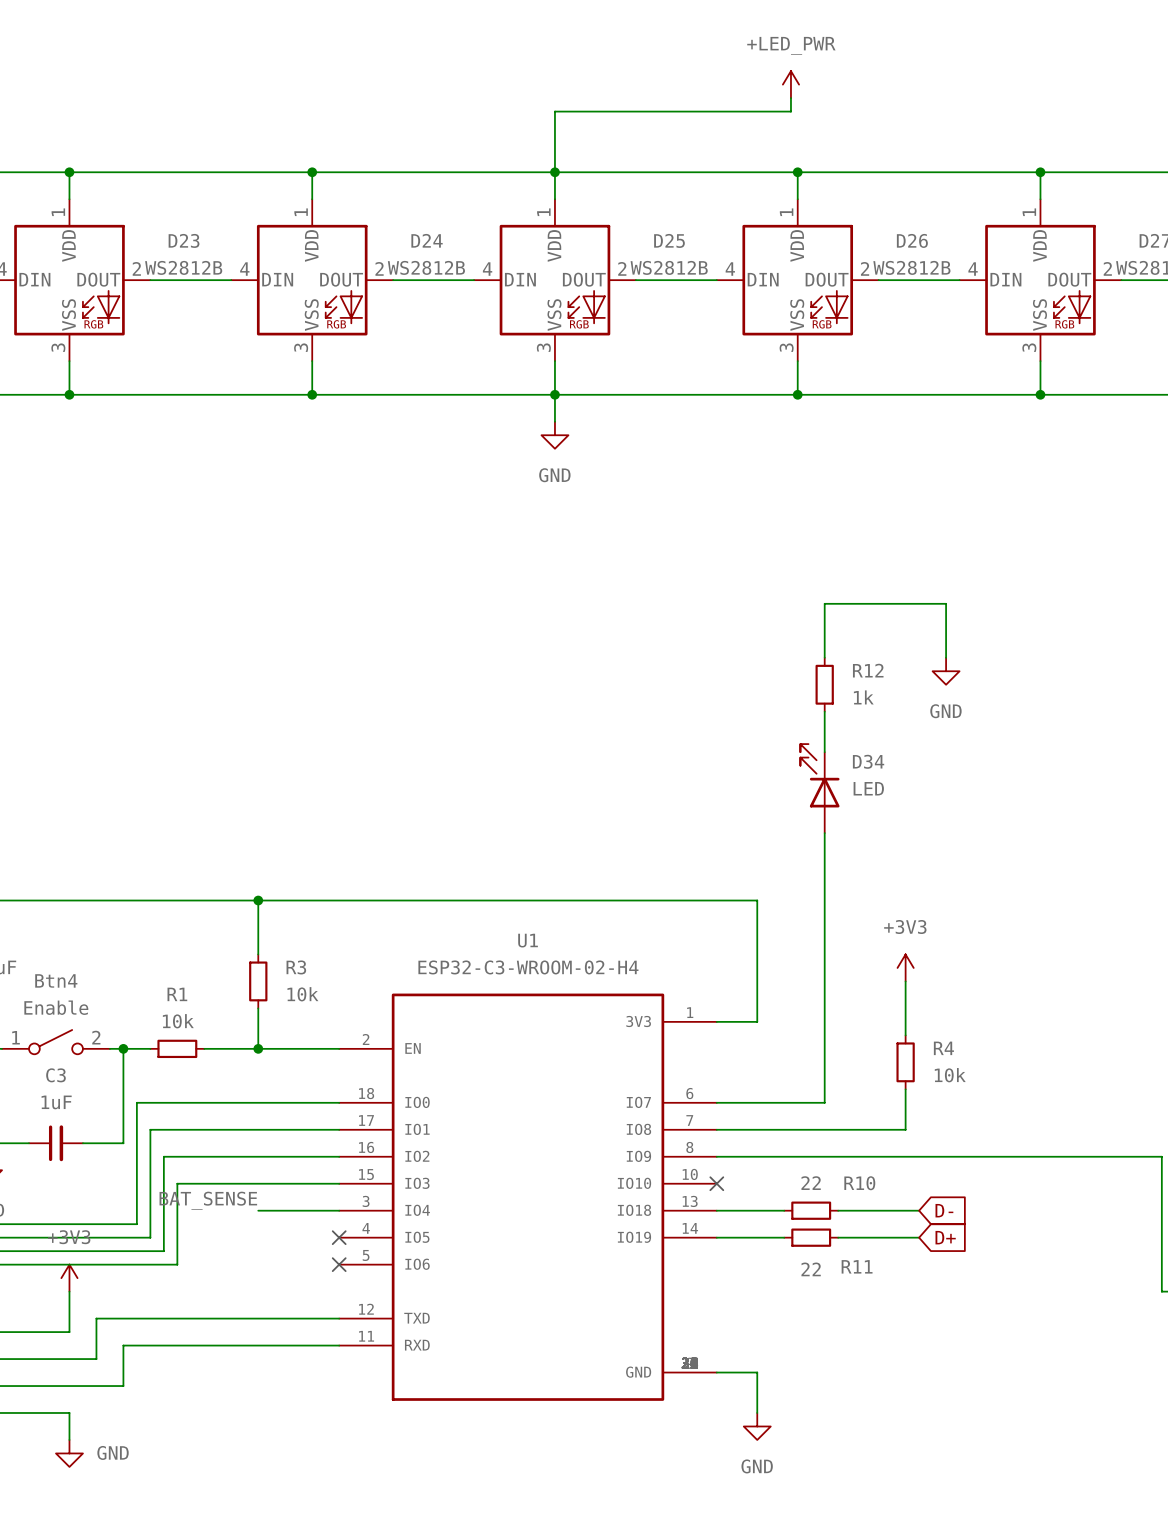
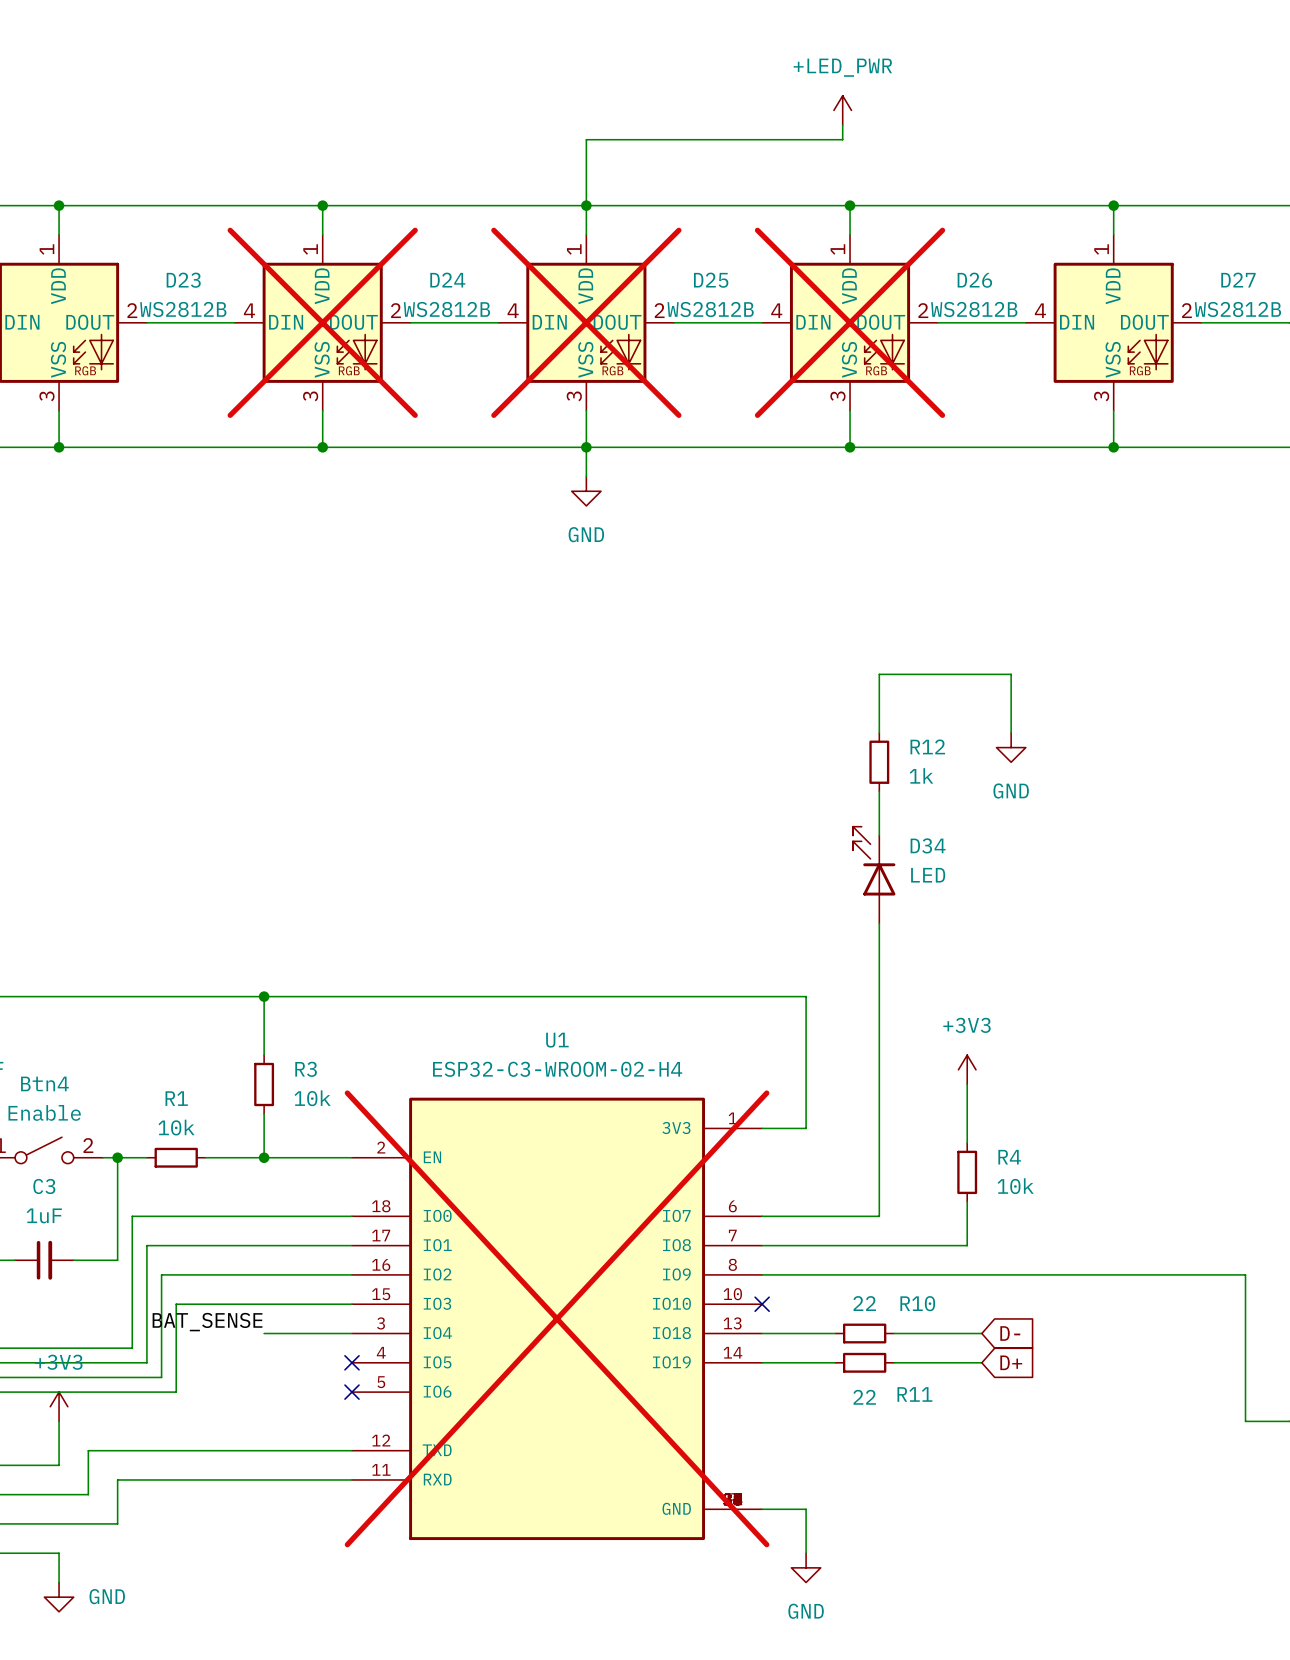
D24 do-not-place cross: none -> (322, 322)
D25 do-not-place cross: none -> (586, 322)
D26 do-not-place cross: none -> (850, 322)
U1 do-not-place cross: none -> (557, 1318)

